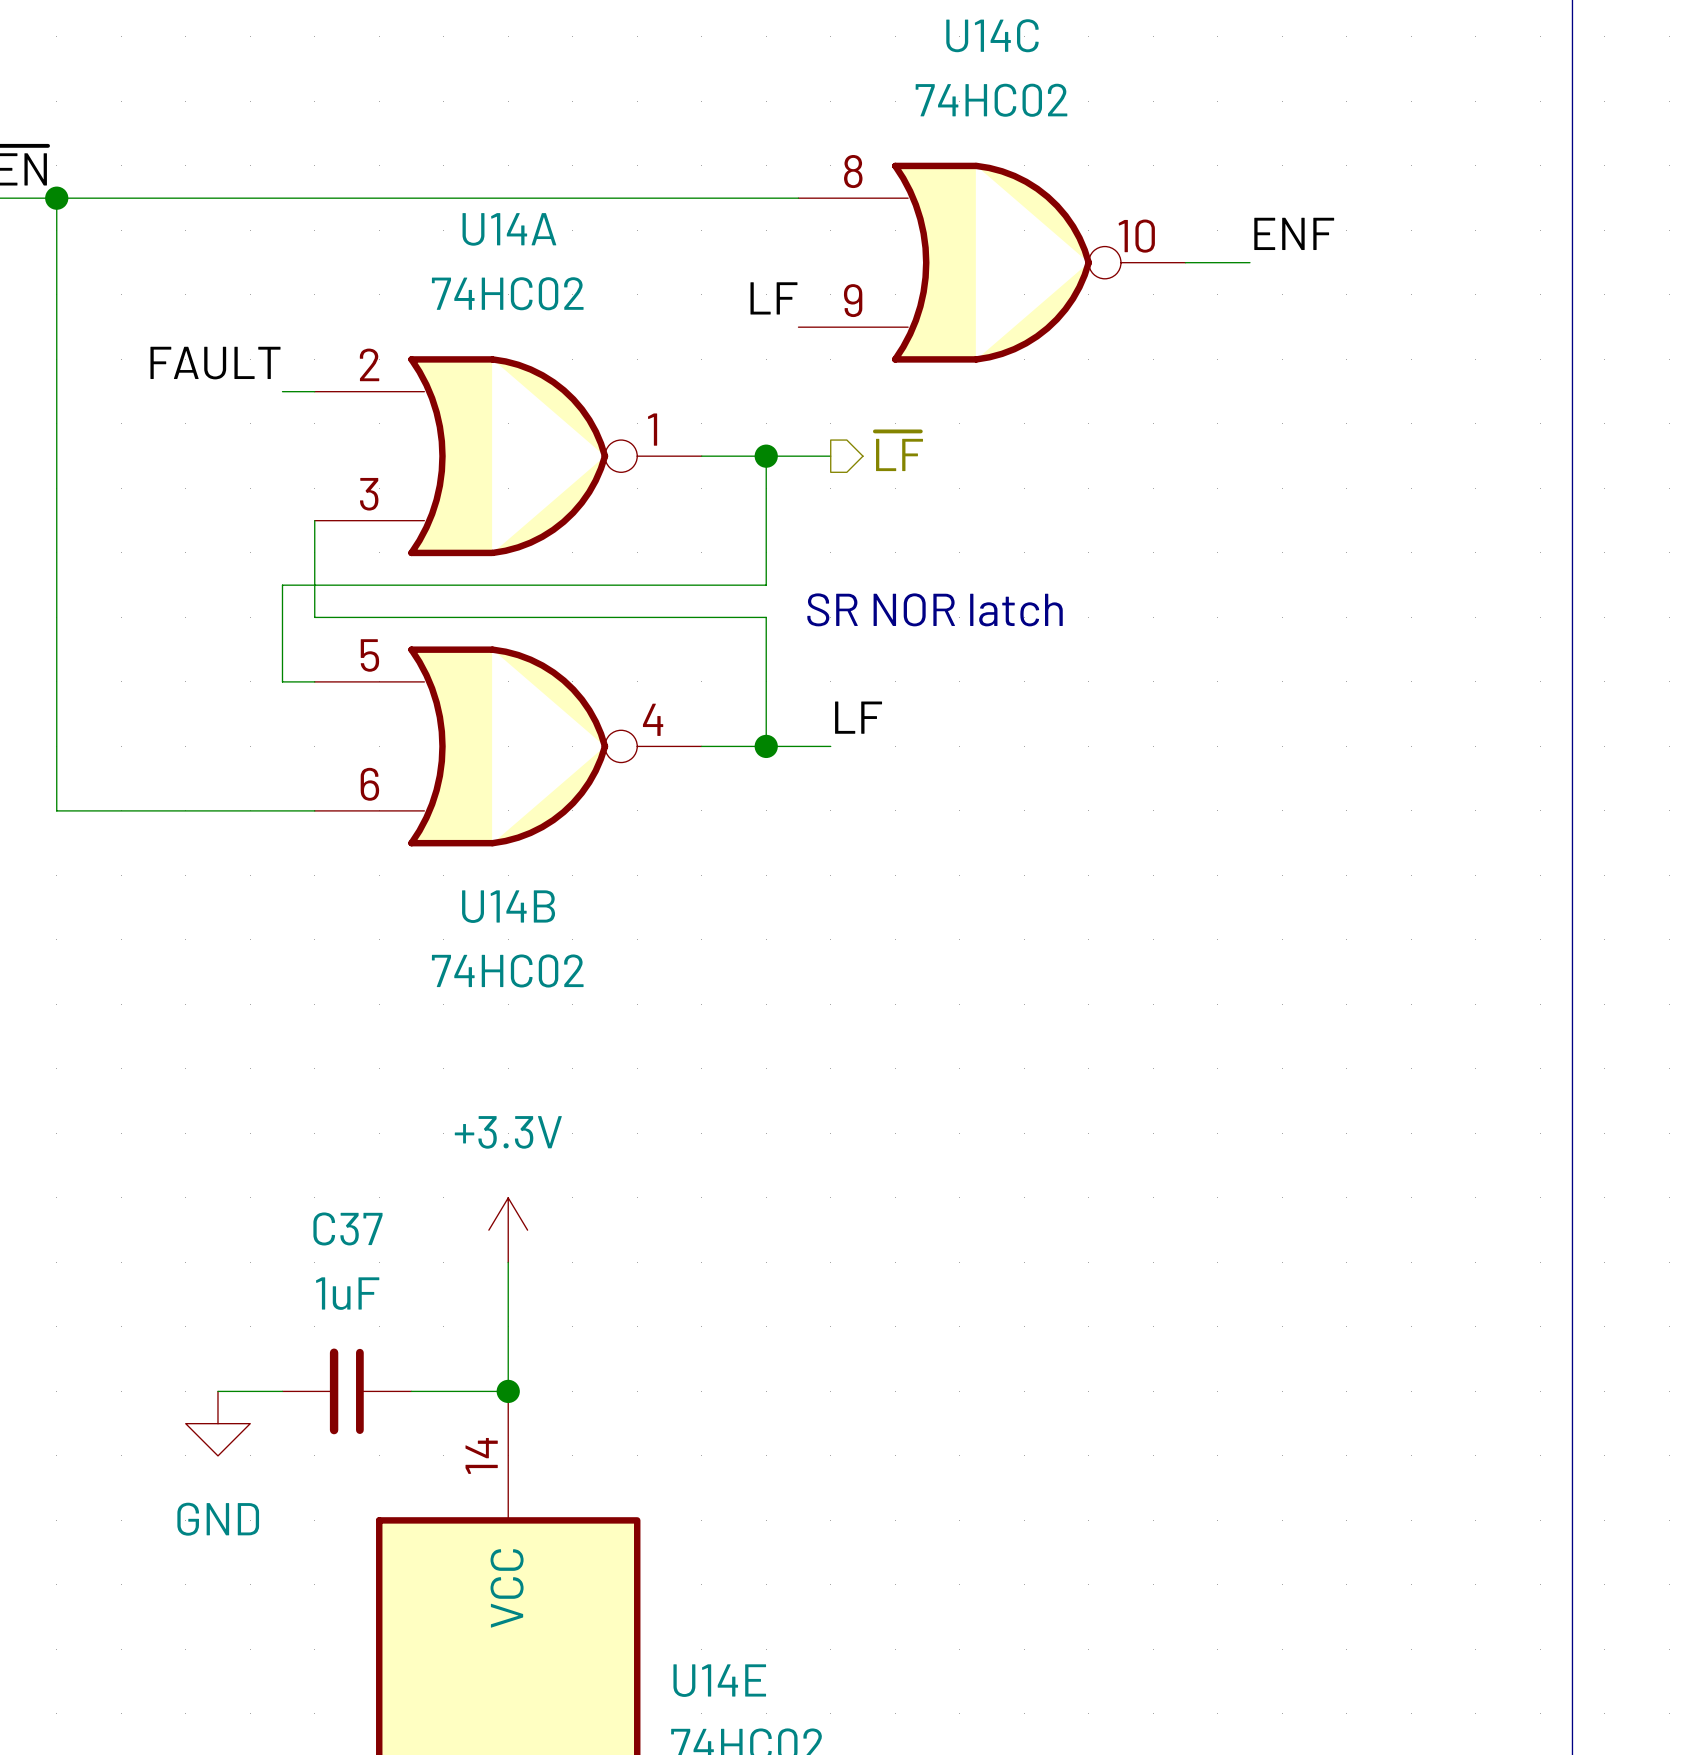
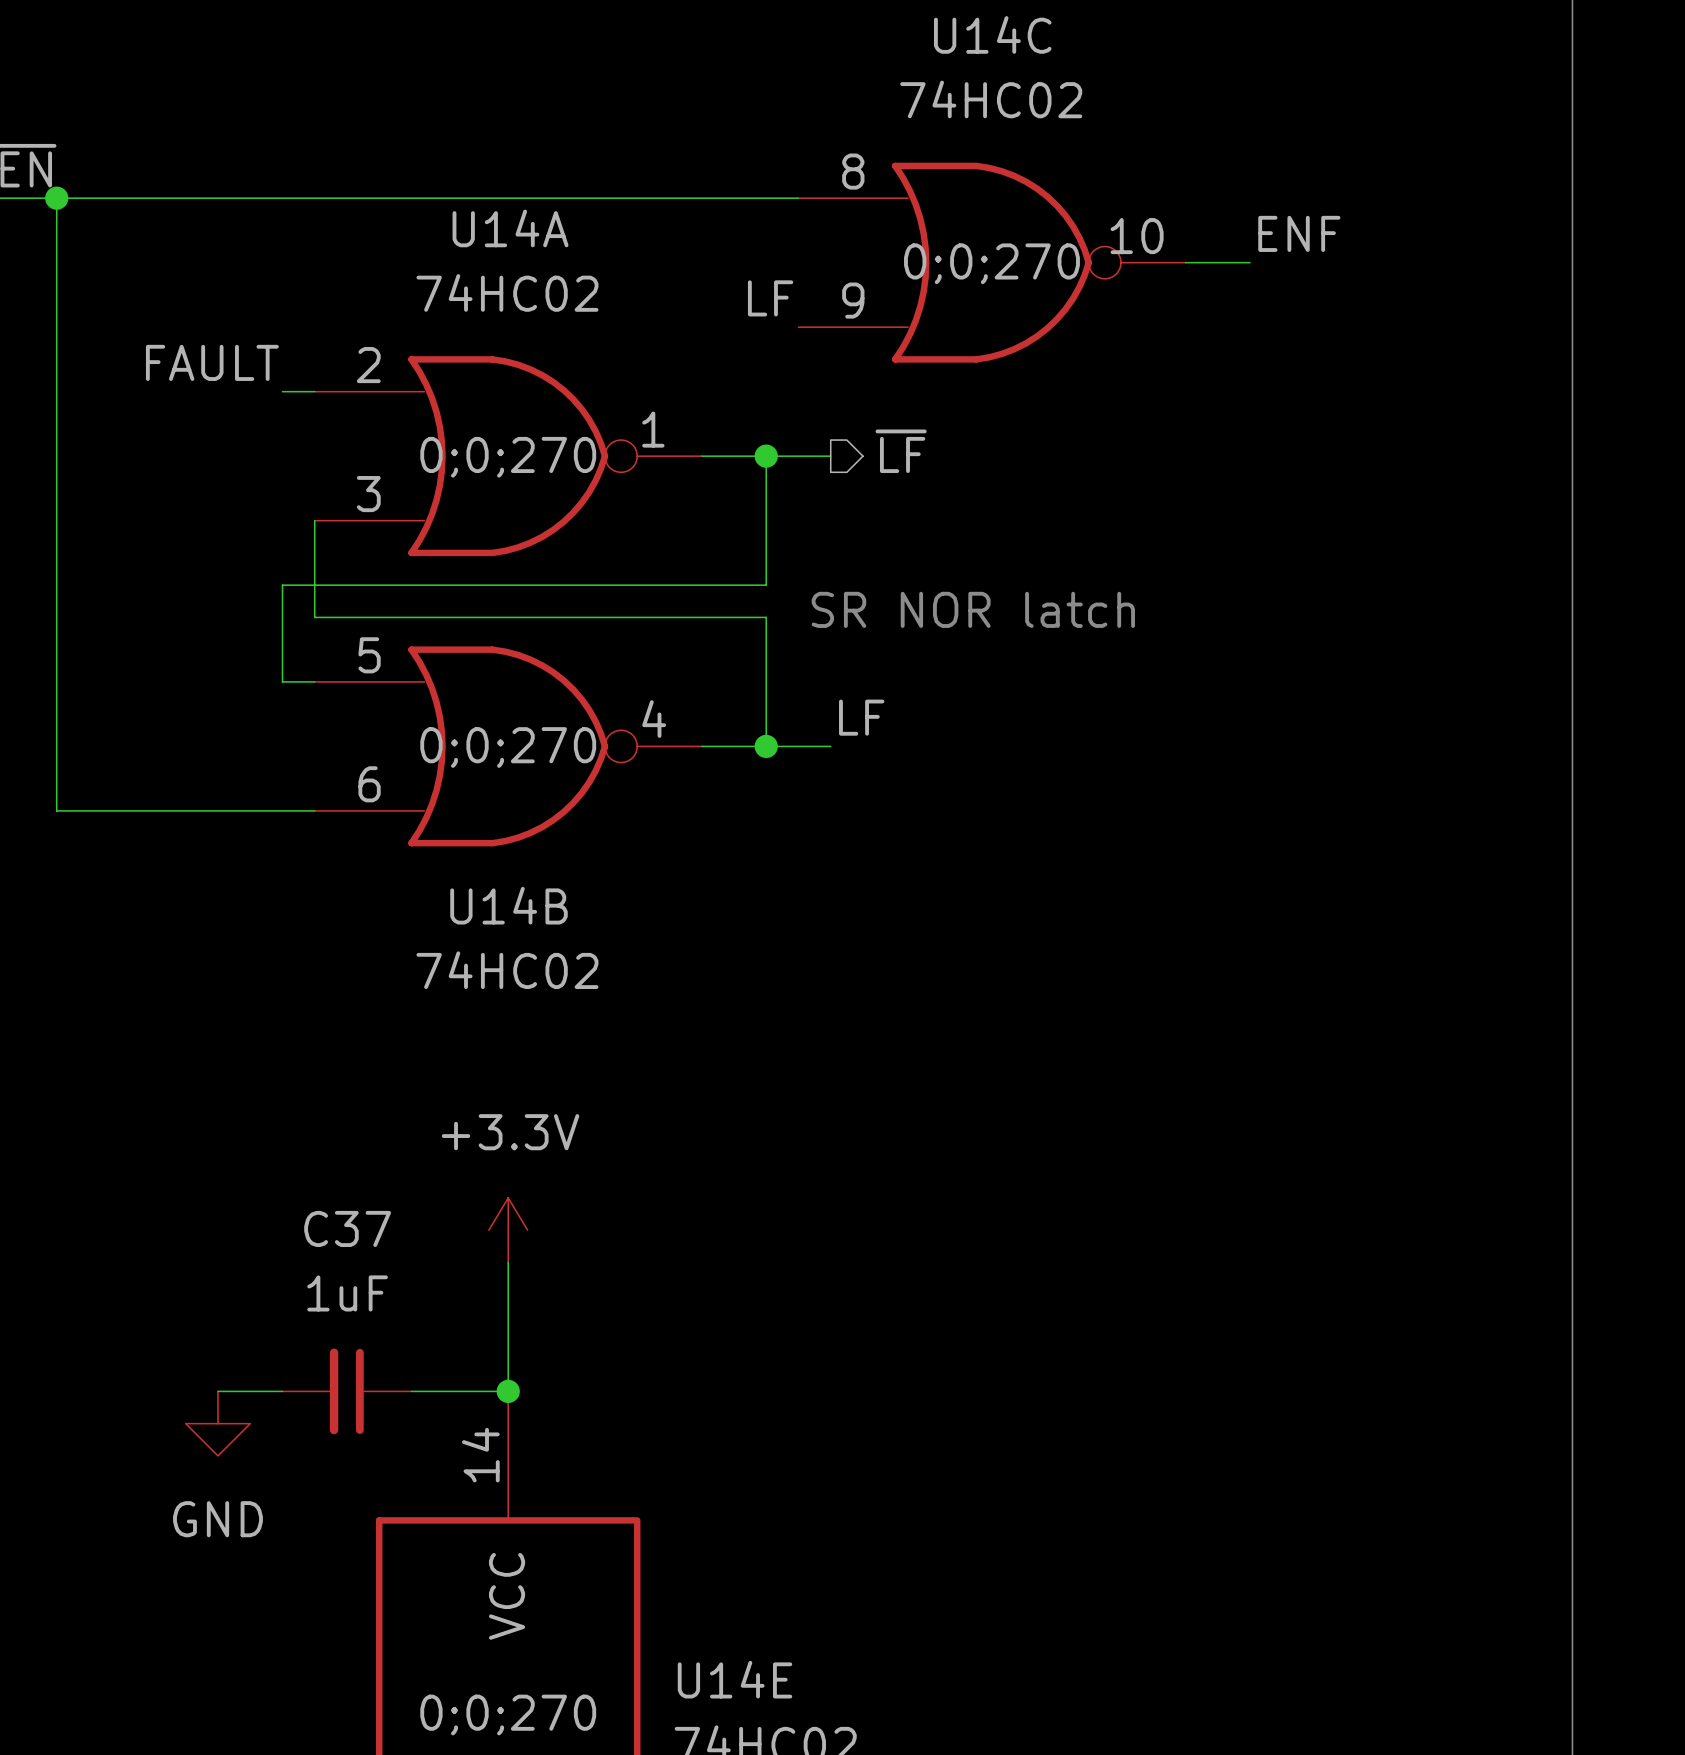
U14C text: none -> 0;0;270 (991, 263)
U14A text: none -> 0;0;270 (508, 457)
U14B text: none -> 0;0;270 (508, 747)
U14E text: none -> 0;0;270 (508, 1715)

